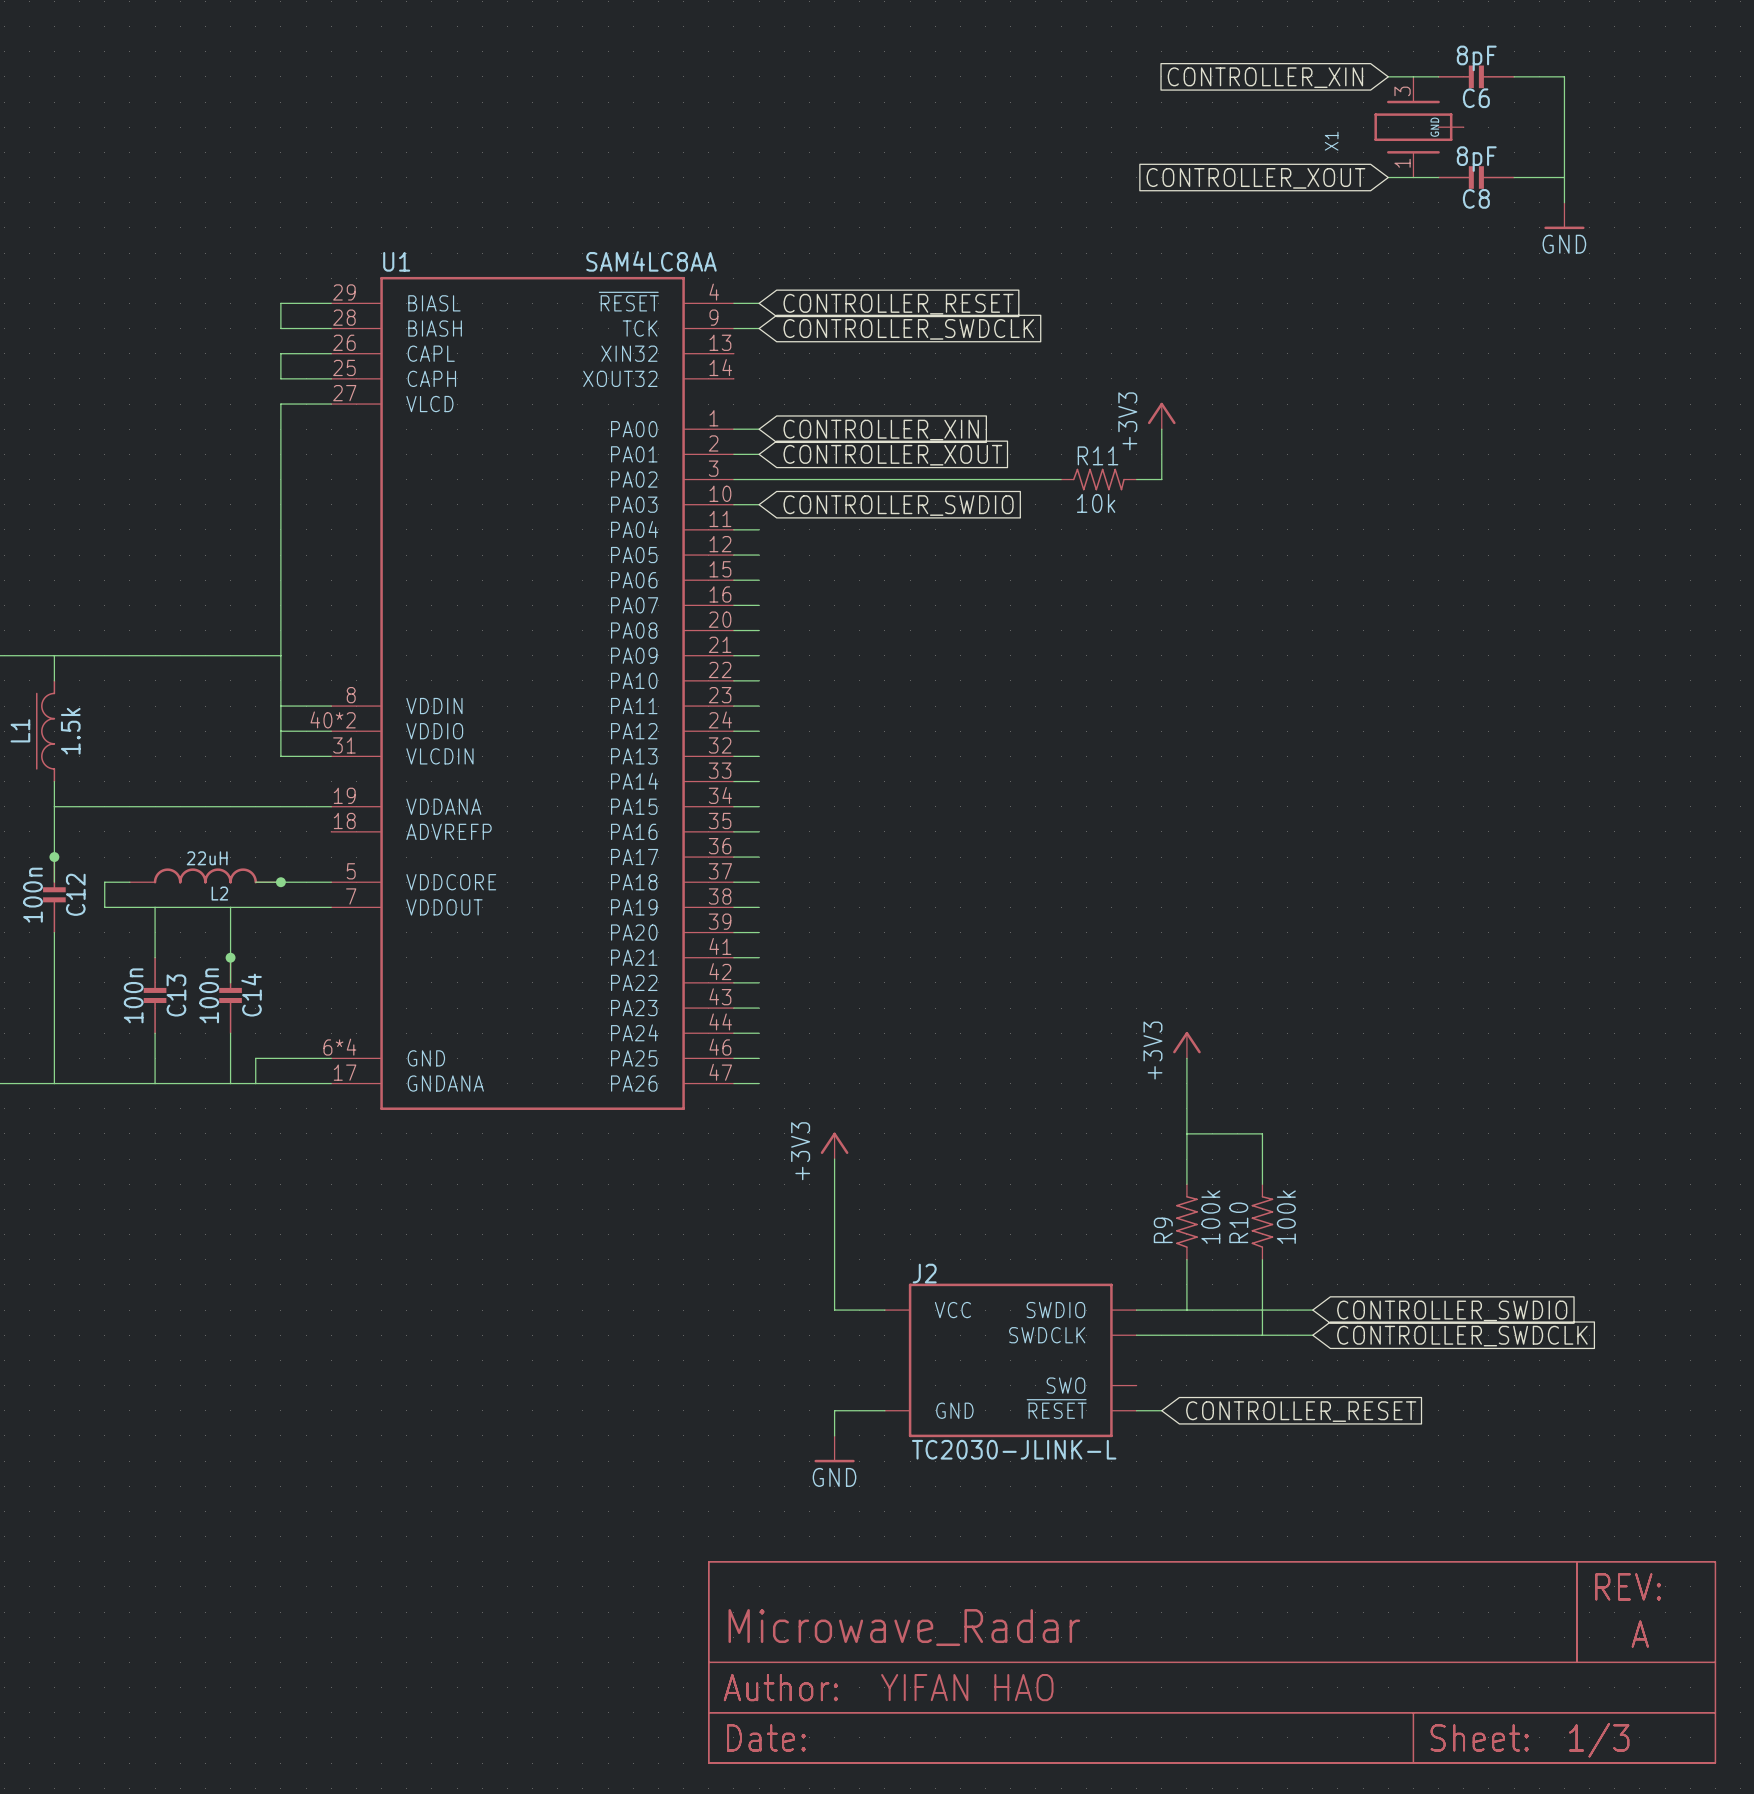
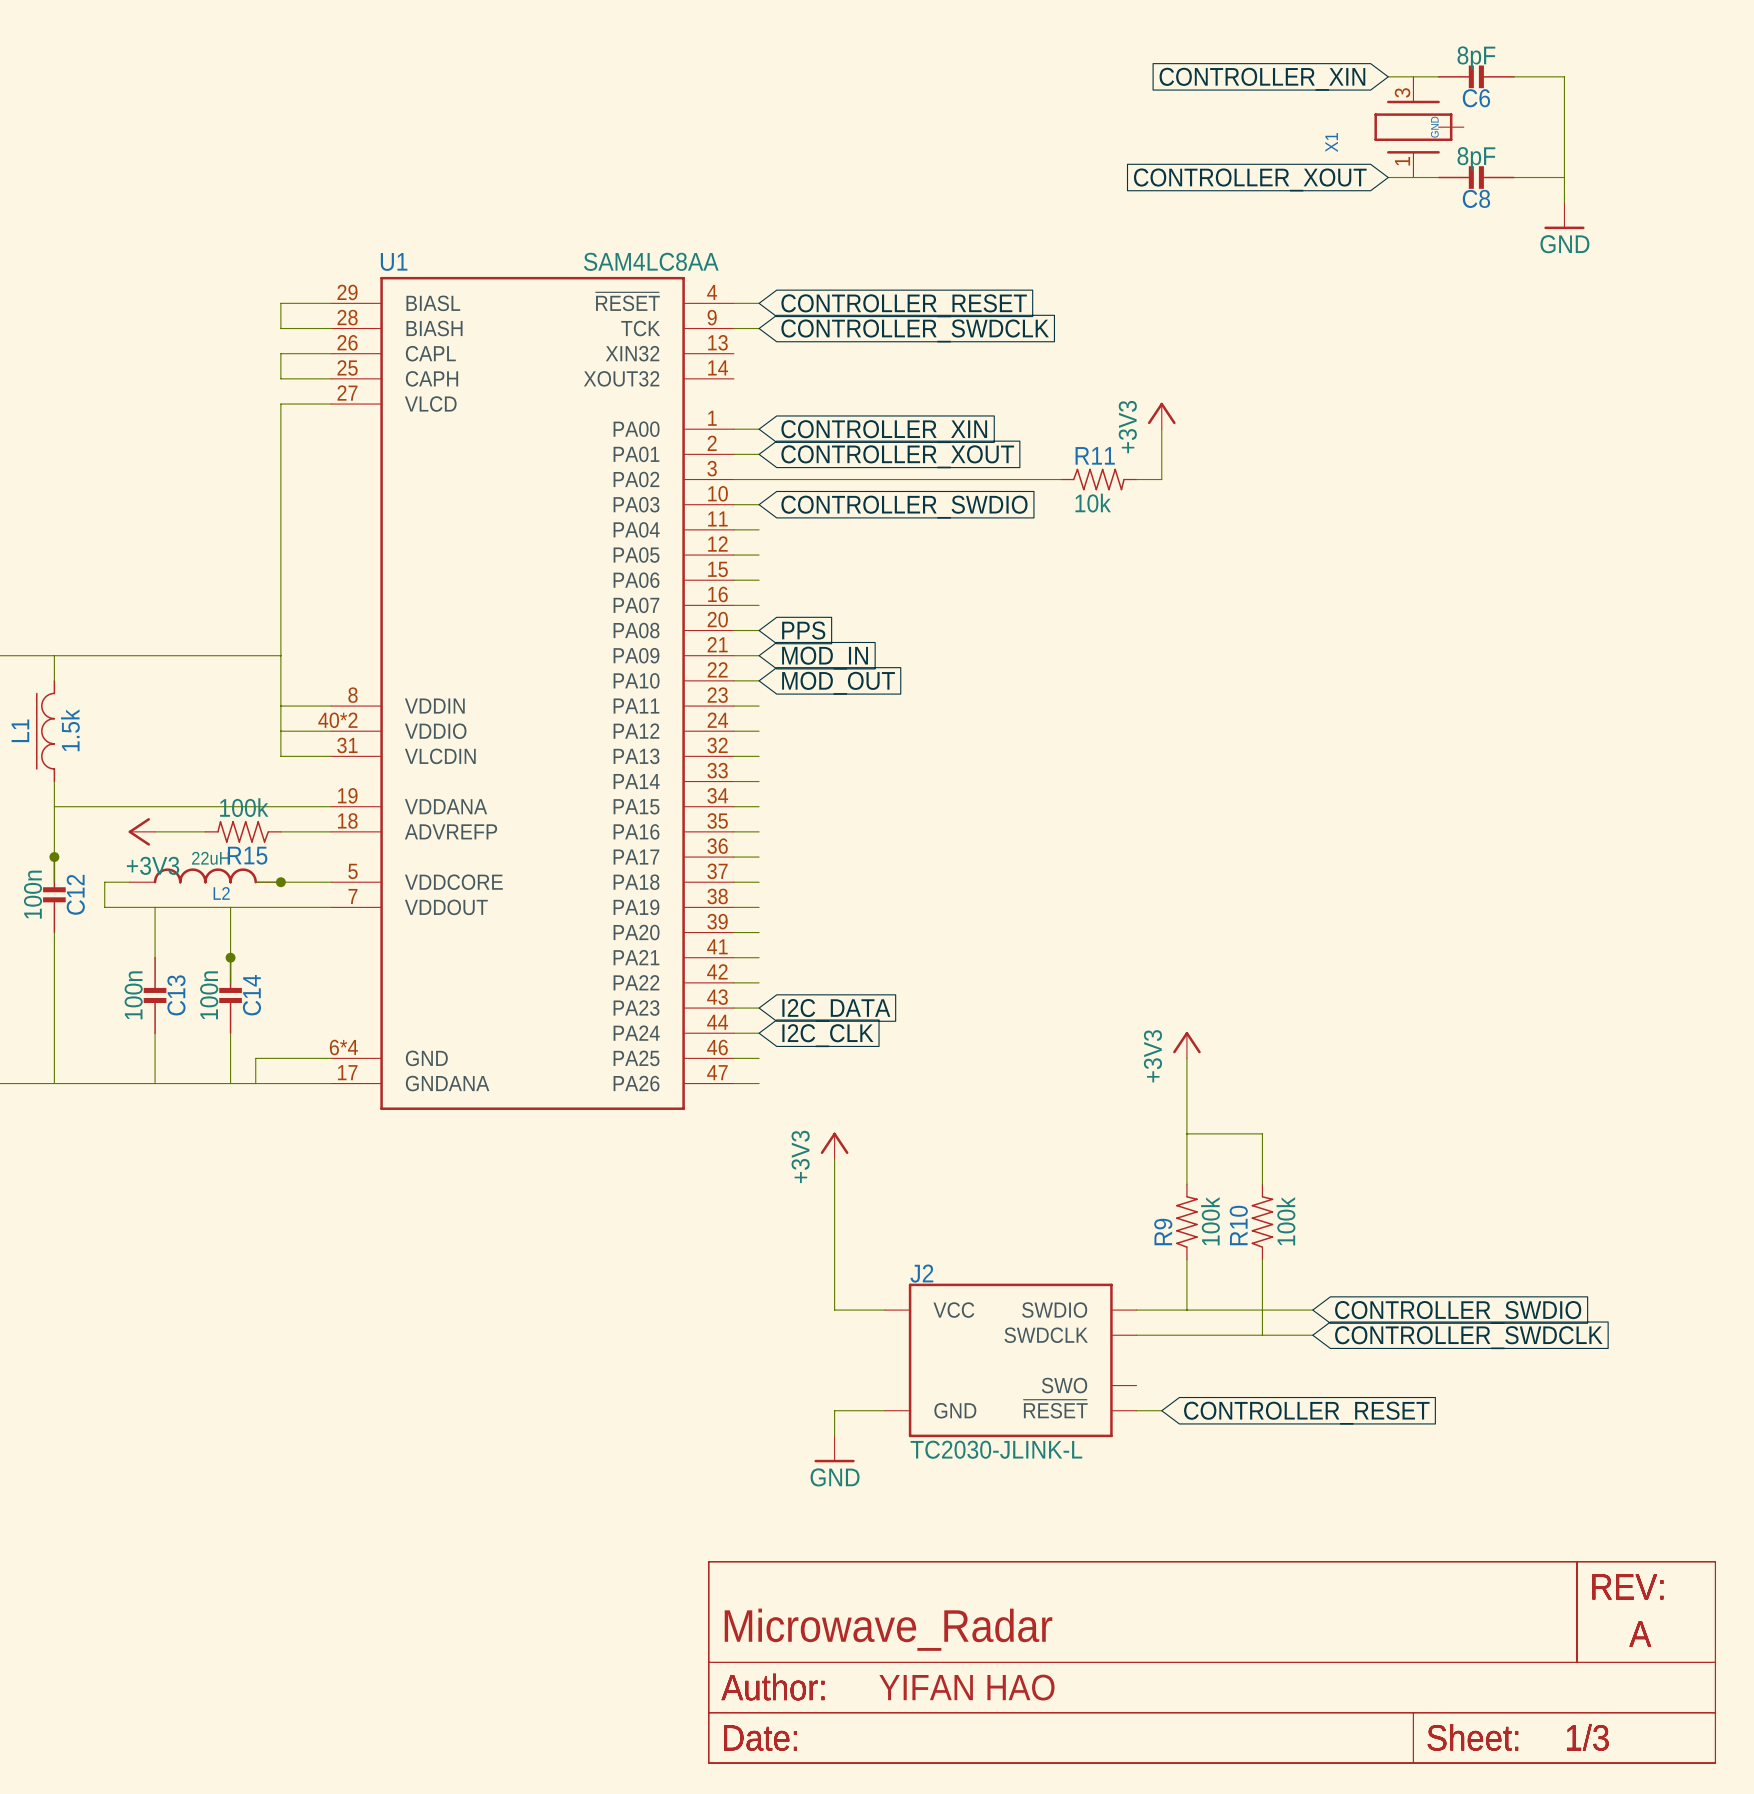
global label: none -> PPS (803, 630)
global label: none -> MOD_IN (825, 658)
global label: none -> MOD_OUT (838, 683)
power symbol: none -> +3V3 (141, 831)
wire: none -> (155, 831) (205, 831)
R15: none -> 100k (243, 831)
wire: none -> (280, 831) (331, 831)
global label: none -> I2C_DATA (836, 1010)
global label: none -> I2C_CLK (827, 1035)

